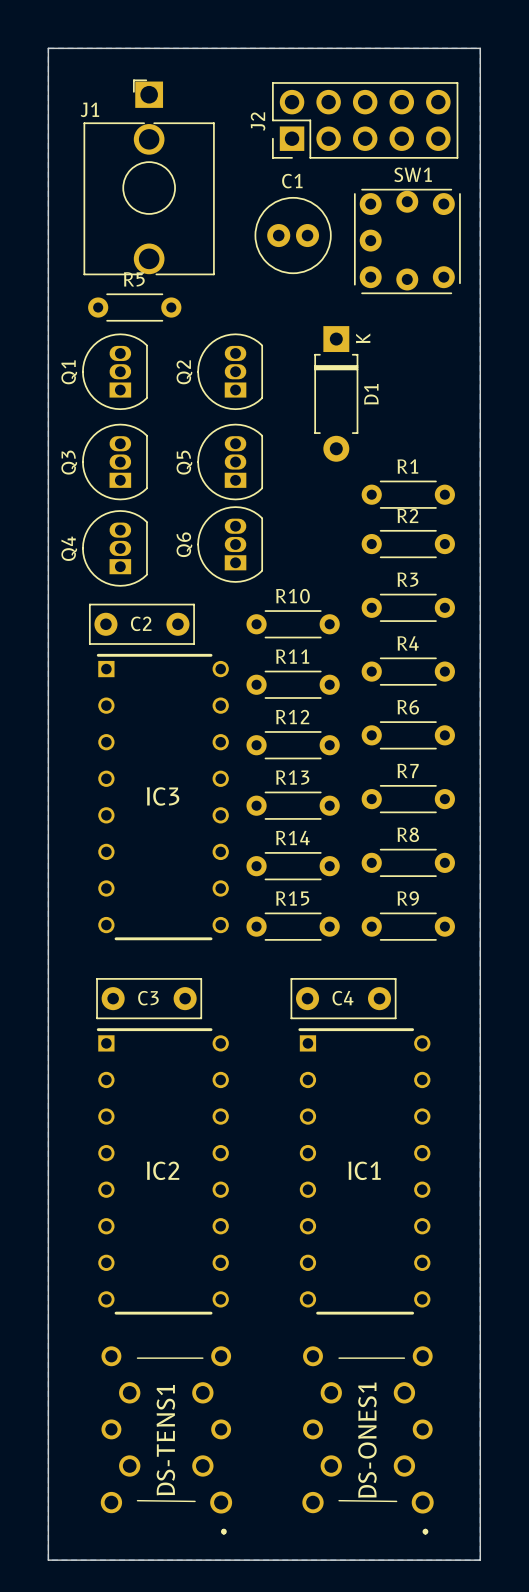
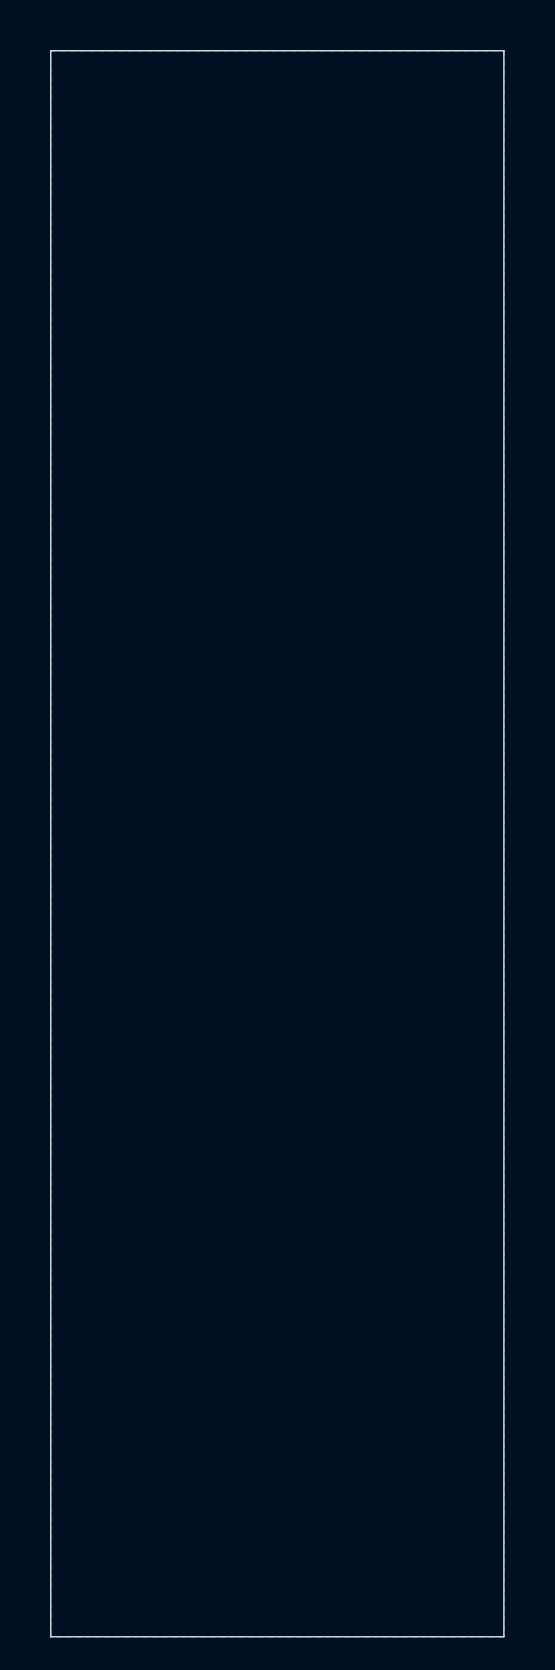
J2: (365, 120) -> none
J1: (149, 177) -> none
C1: (293, 235) -> none
SW1: (407, 241) -> none
R5: (134, 307) -> none
Q1: (114, 371) -> none
Q2: (230, 371) -> none
D1: (336, 393) -> none
Q3: (114, 462) -> none
Q5: (230, 462) -> none
R1: (408, 494) -> none
Q6: (230, 544) -> none
R2: (408, 544) -> none
Q4: (114, 548) -> none
R3: (408, 607) -> none
C2: (141, 624) -> none
R10: (293, 624) -> none
R4: (408, 671) -> none
R11: (293, 684) -> none
R6: (408, 735) -> none
R12: (293, 745) -> none
IC3: (162, 797) -> none
R7: (408, 799) -> none
R13: (293, 805) -> none
R8: (408, 862) -> none
R14: (293, 866) -> none
R15: (293, 926) -> none
R9: (408, 926) -> none
C3: (149, 998) -> none
C4: (343, 998) -> none
IC2: (162, 1171) -> none
IC1: (364, 1171) -> none
DS-TENS1: (166, 1440) -> none
DS-ONES1: (368, 1440) -> none

